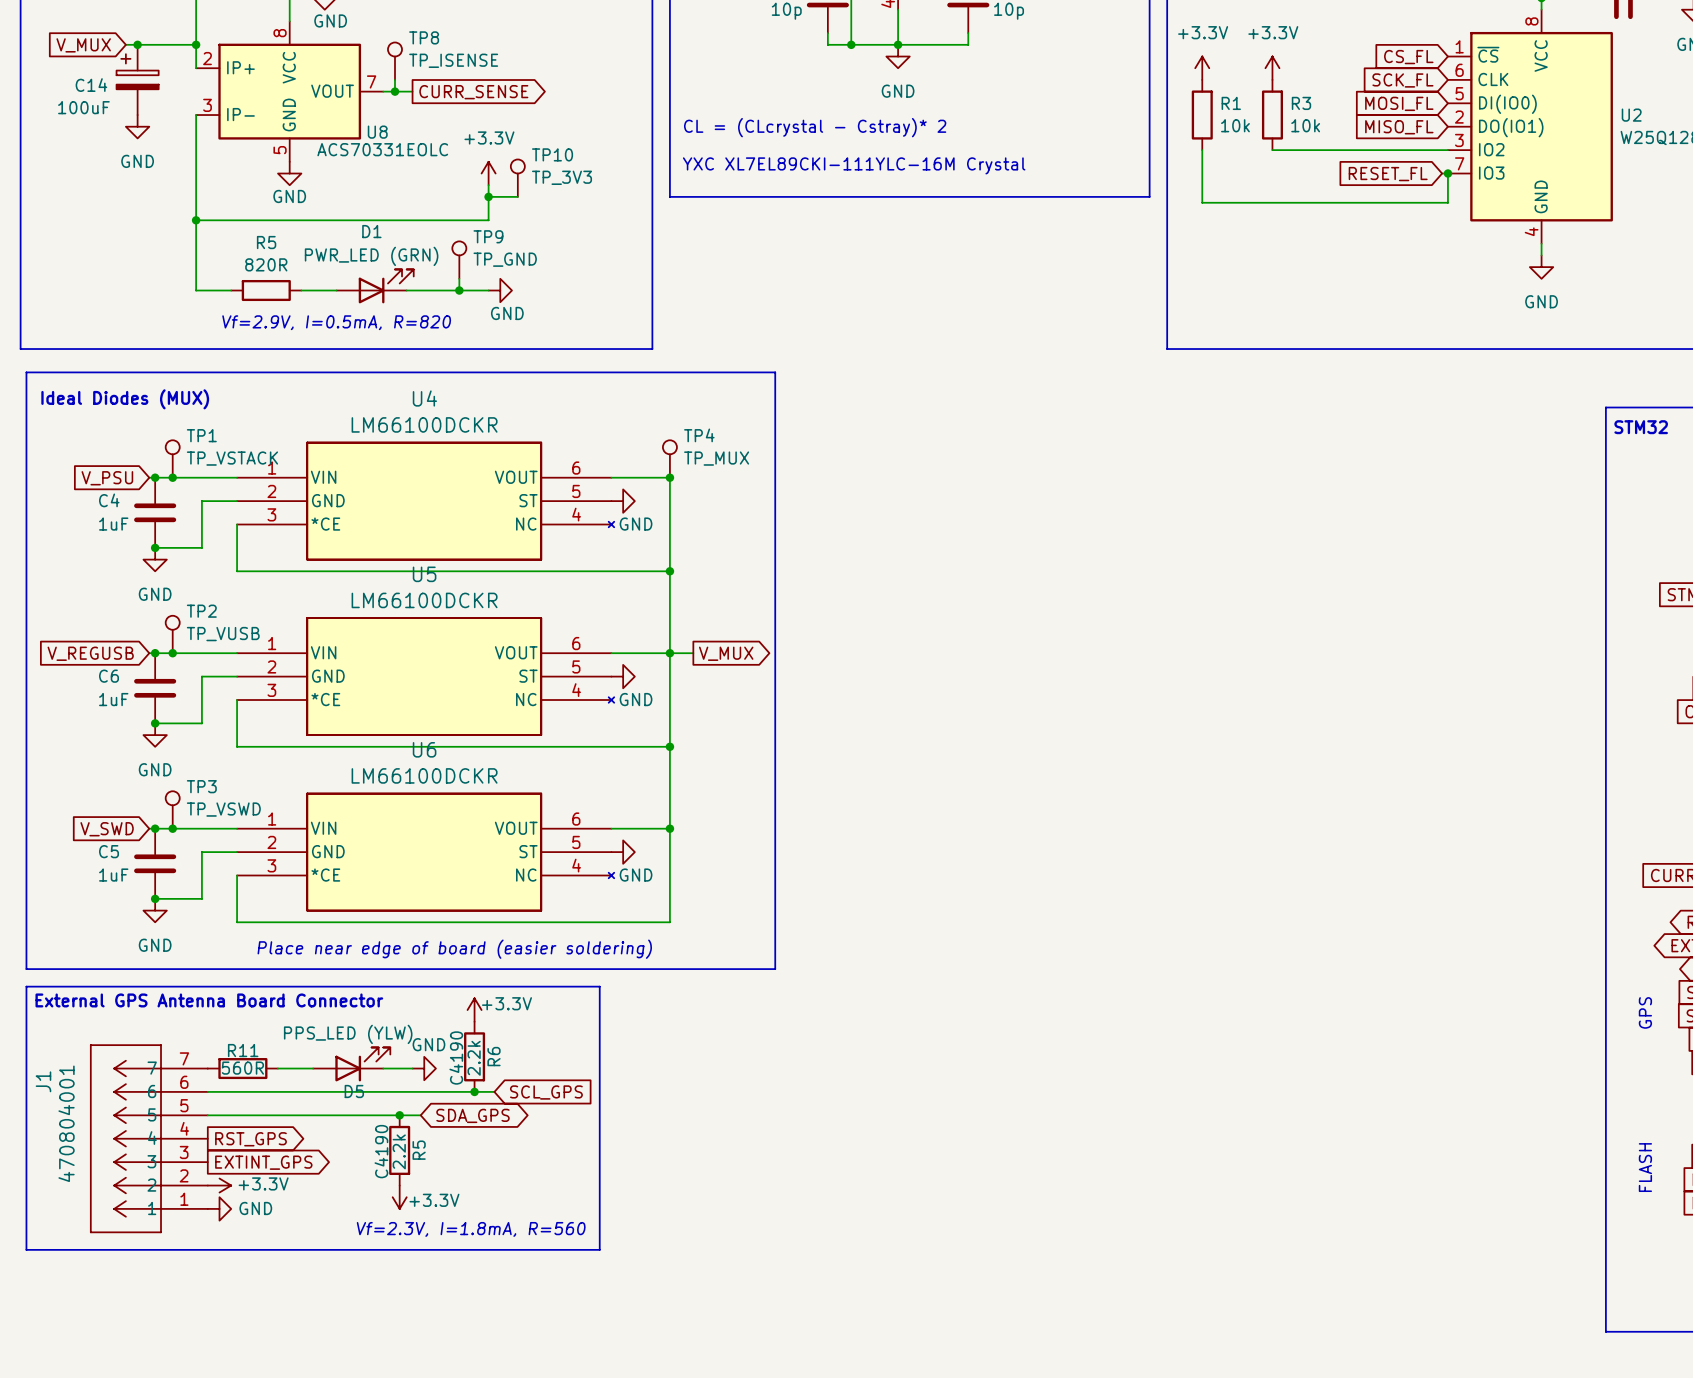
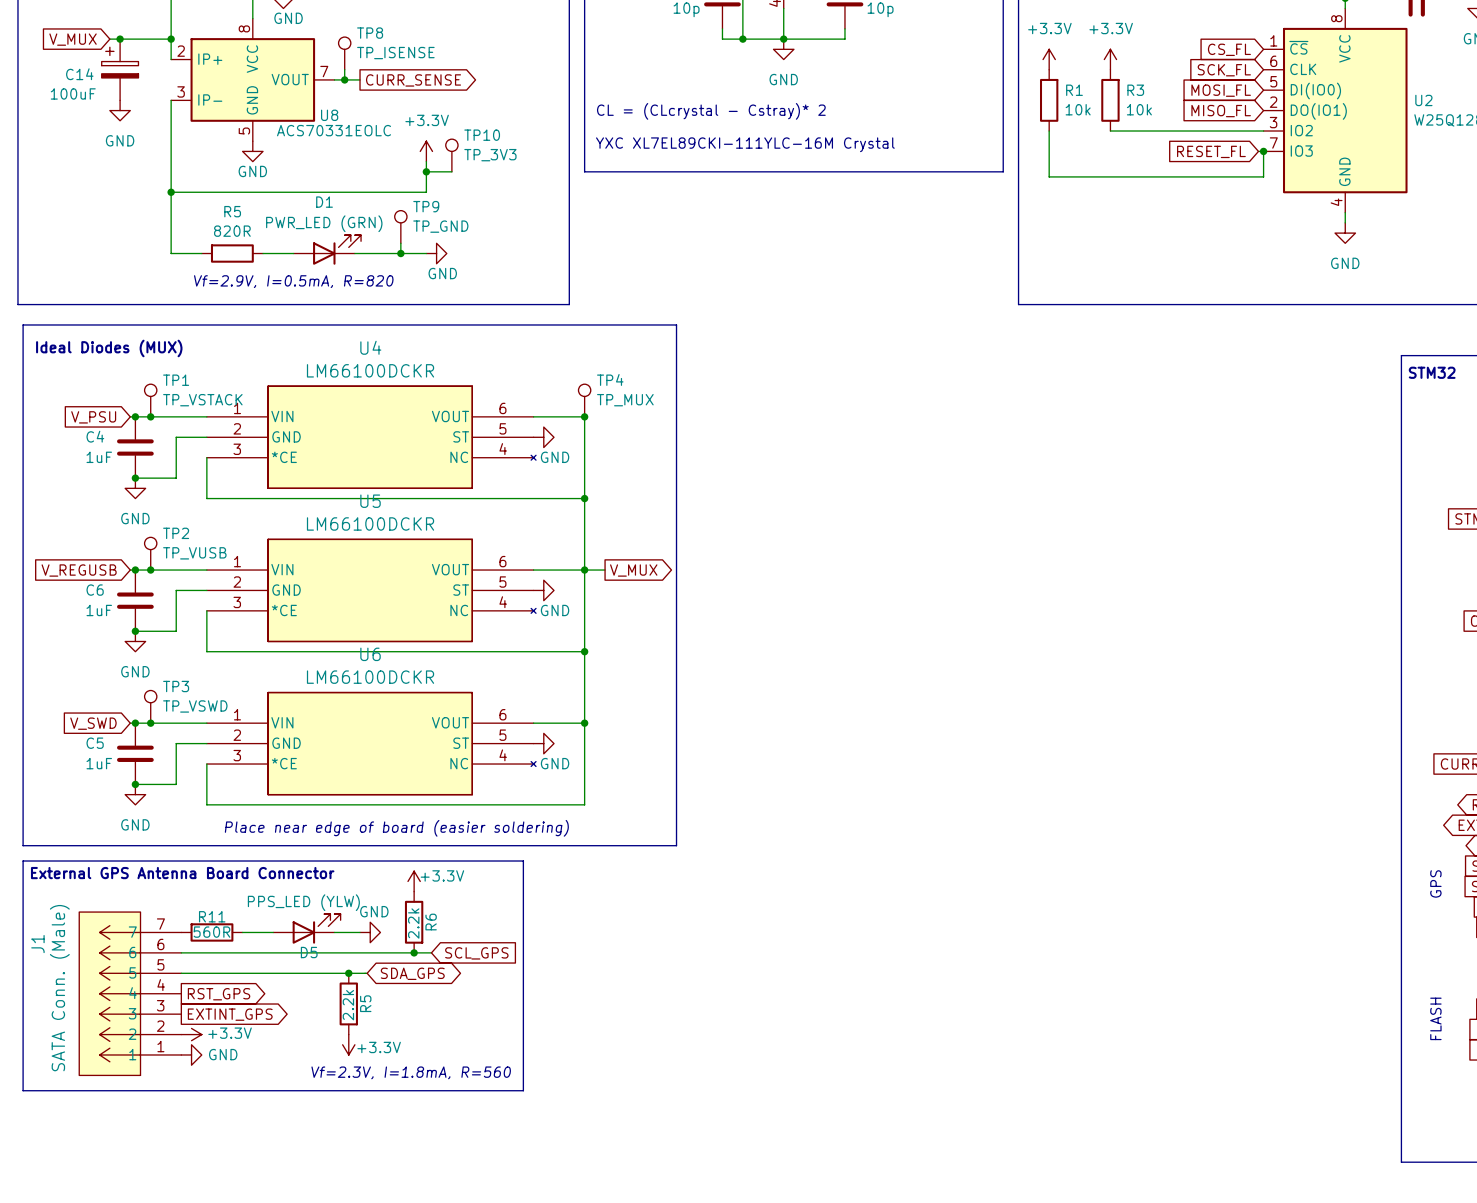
J1 symbol: [90, 1044, 208, 1233] -> [79, 912, 182, 1076]
R6 text: C4190 (456, 1058) -> none
J1 value: 470804001 (66, 1123) -> SATA Conn. (Male) (59, 988)
R5 text: C4190 (381, 1151) -> none

